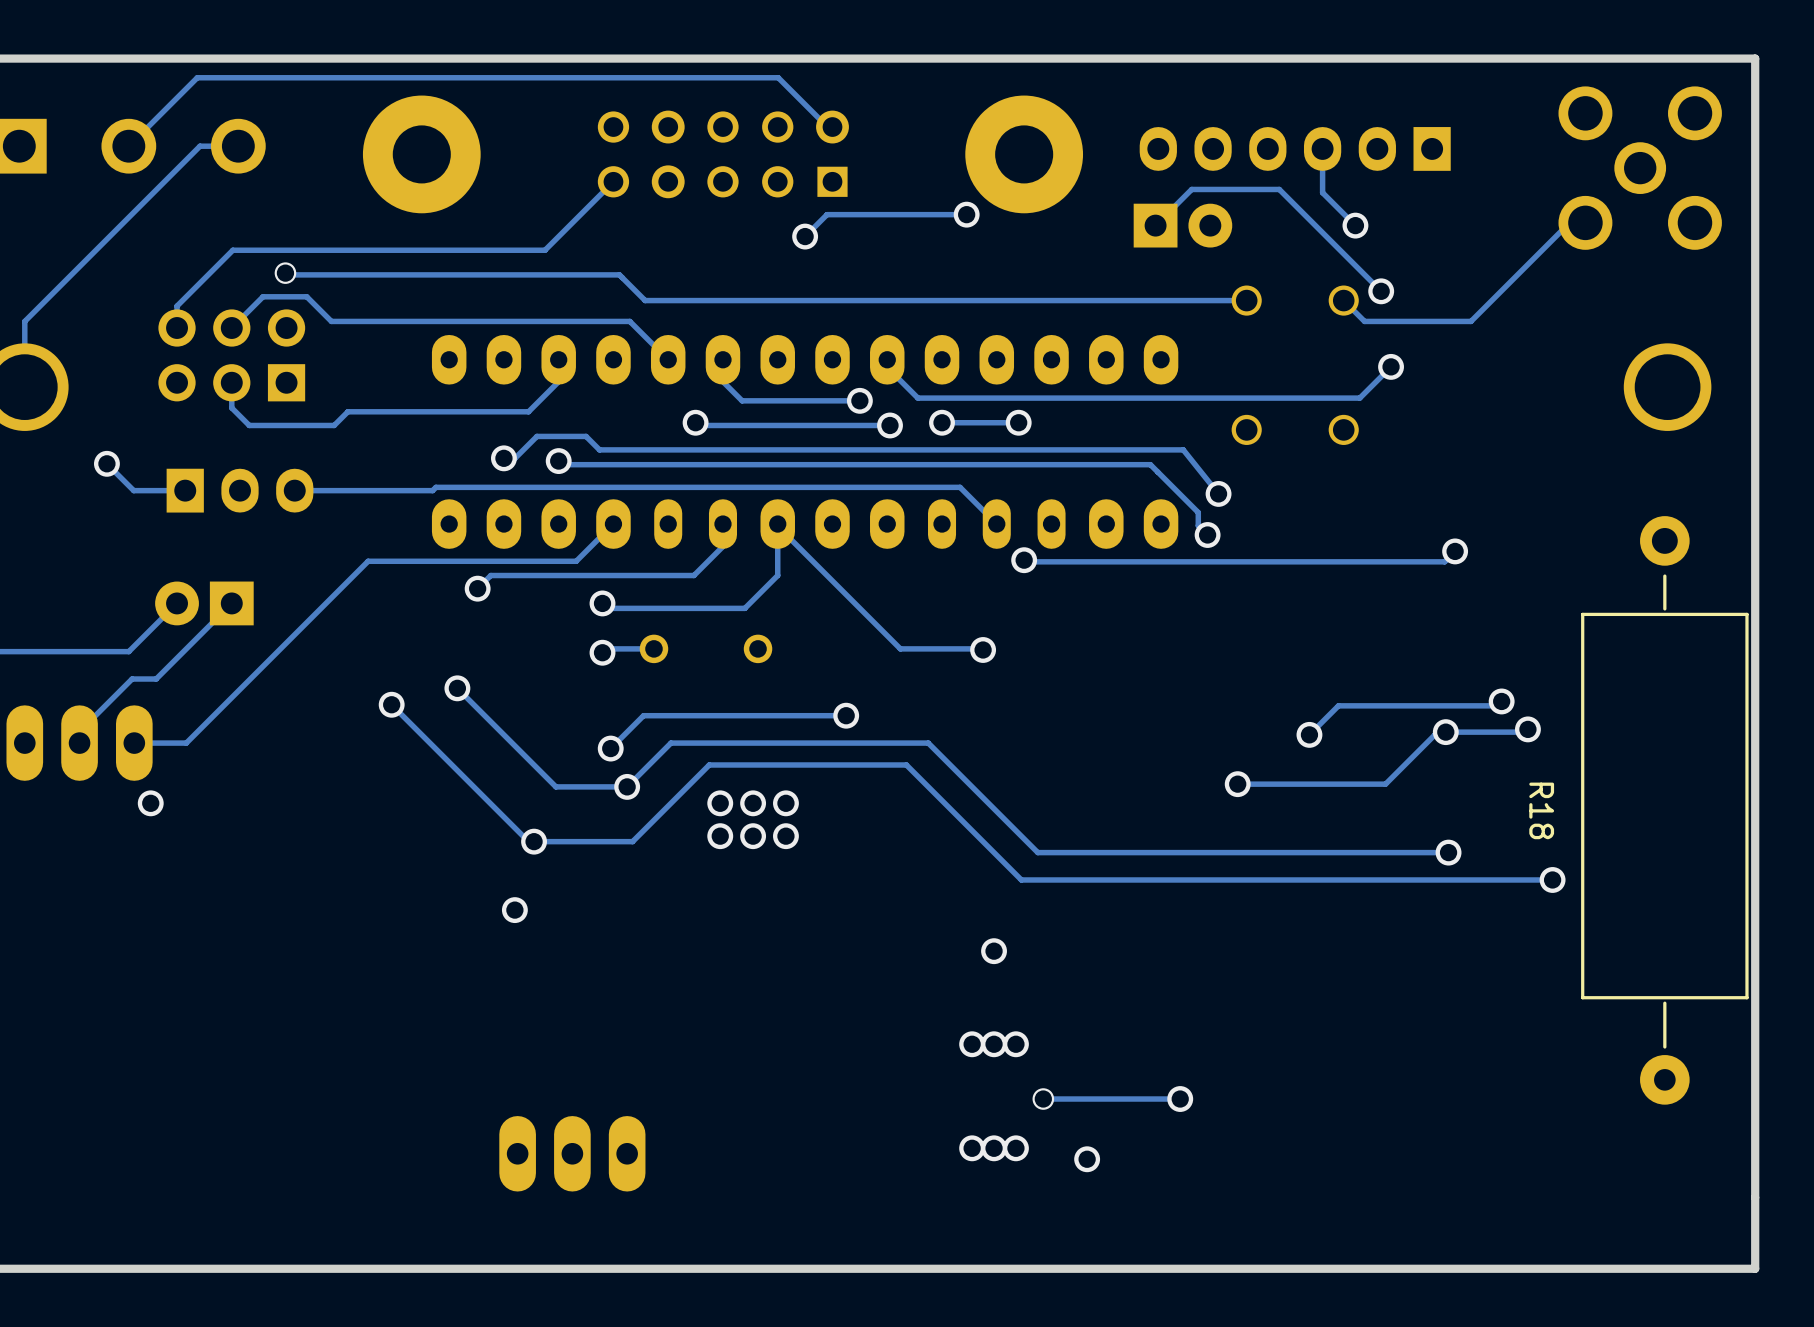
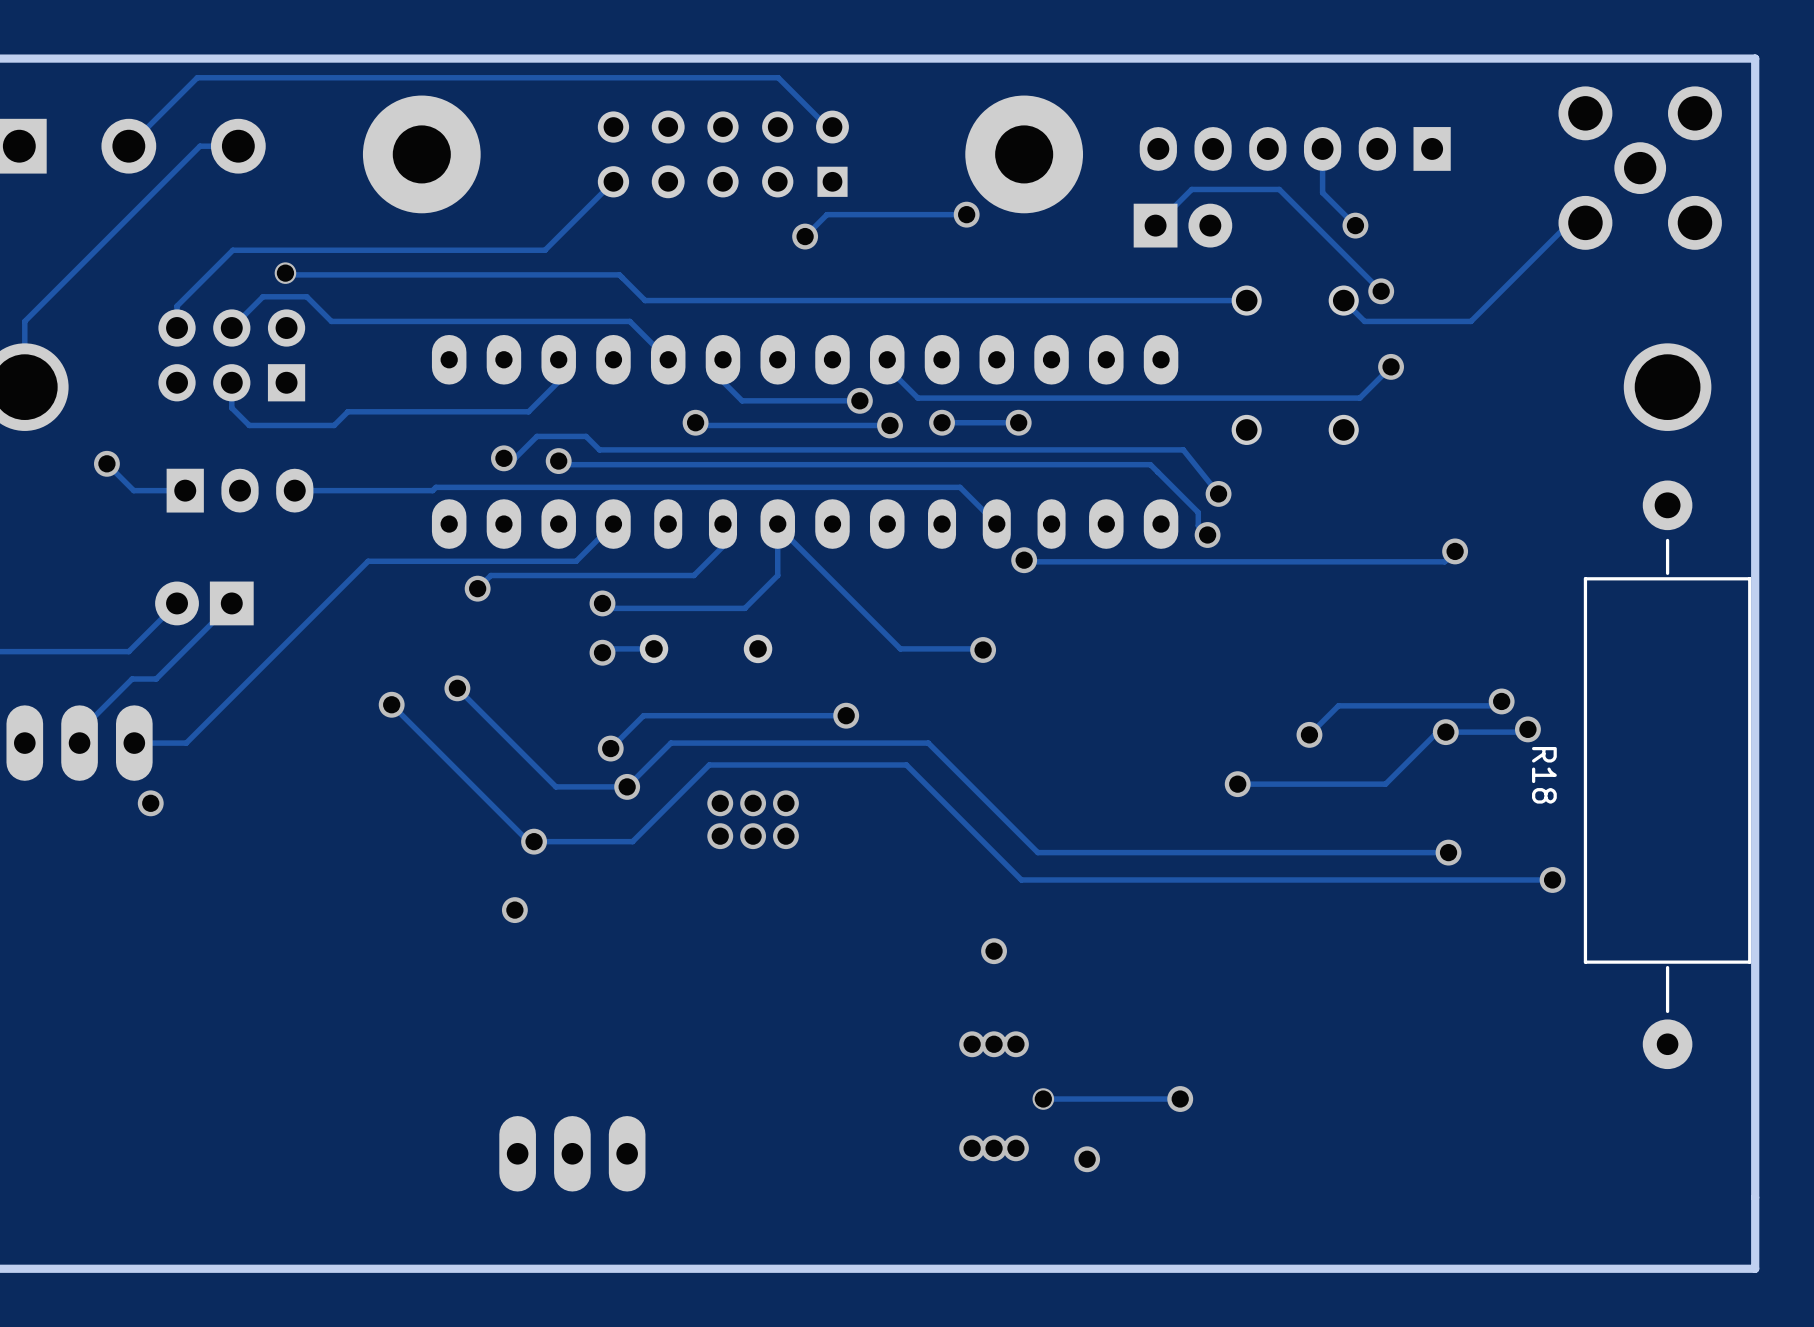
R18 position: (1664, 810) -> (1667, 774)

